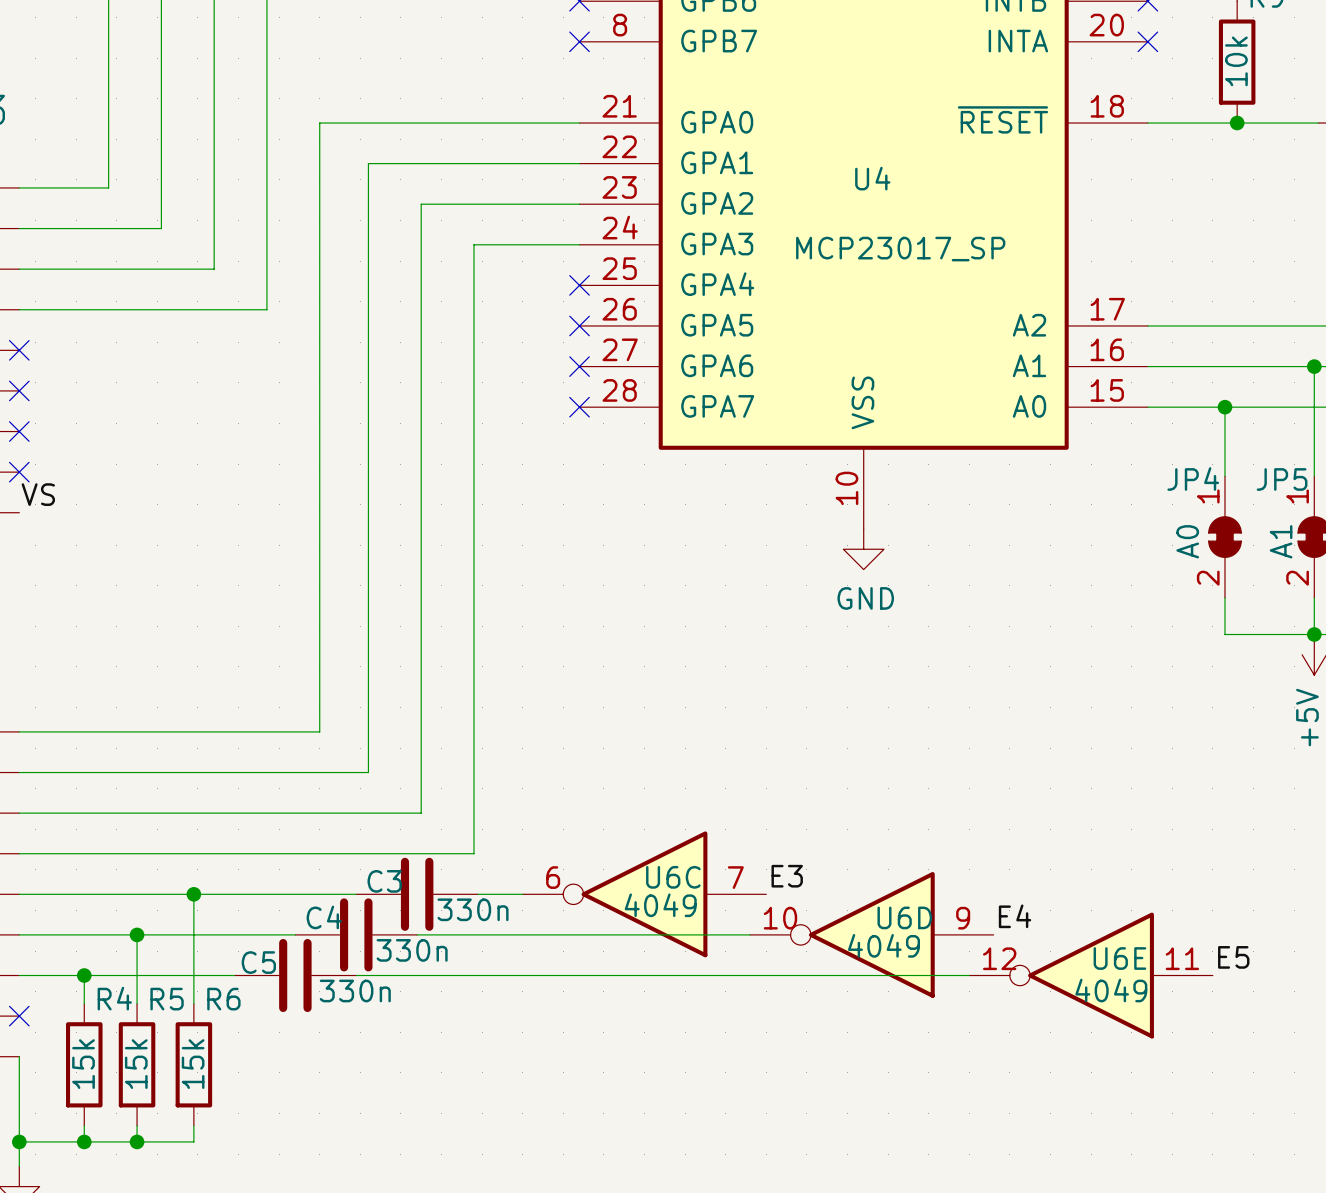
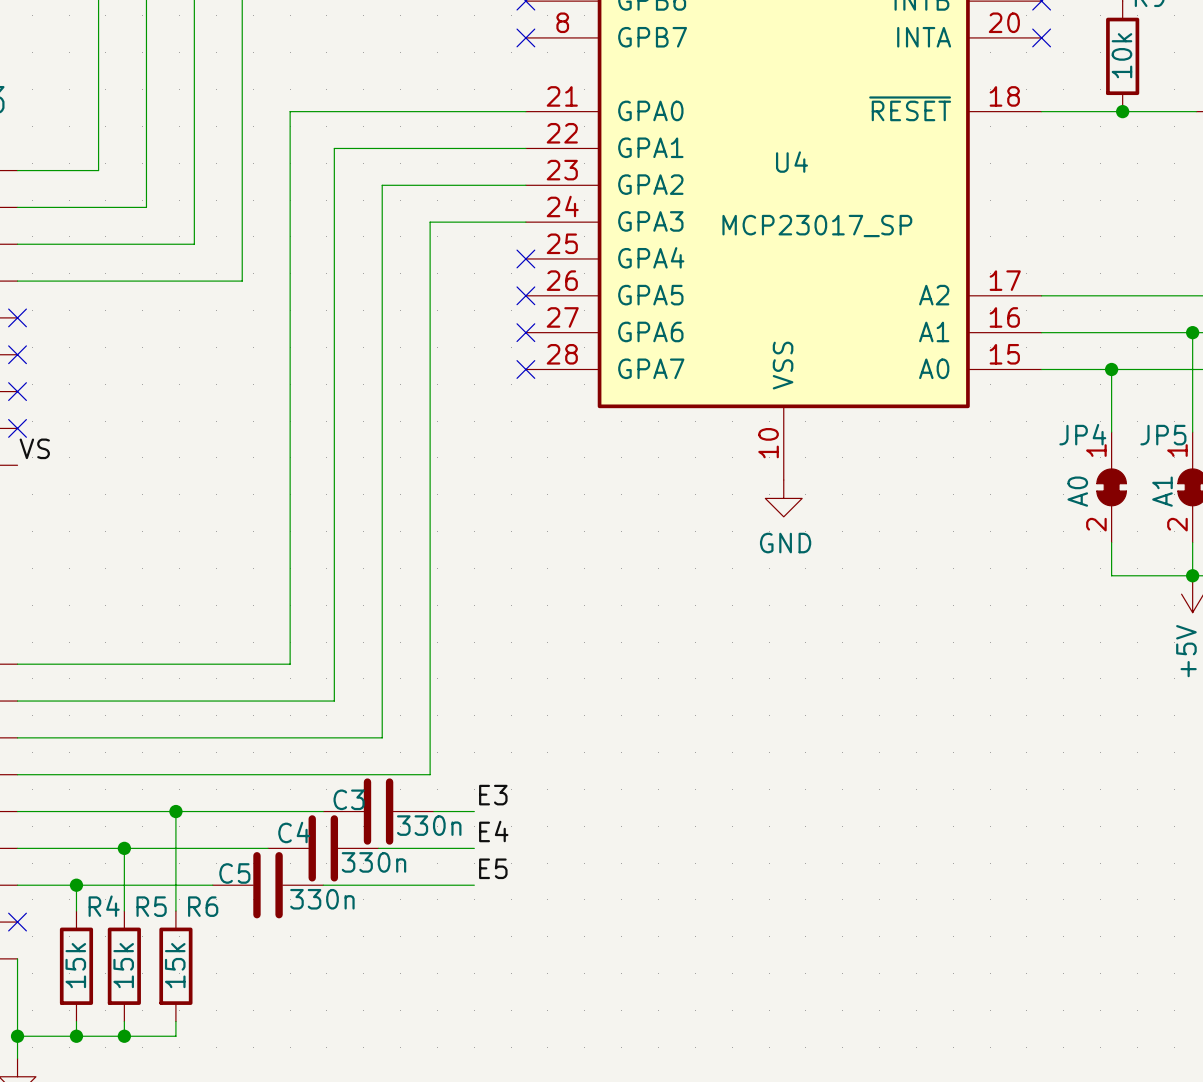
label position: E3 (787, 876) -> E3 (493, 795)
U6C: 4049 (644, 894) -> none
label: none -> E4 (493, 831)
label: E4 (1015, 916) -> none
wire: (522, 934) (750, 934) -> none
U6D: 4049 (871, 934) -> none
label: none -> E5 (493, 868)
label: E5 (1233, 957) -> none
wire: (522, 975) (969, 975) -> none
U6E: 4049 (1091, 975) -> none

